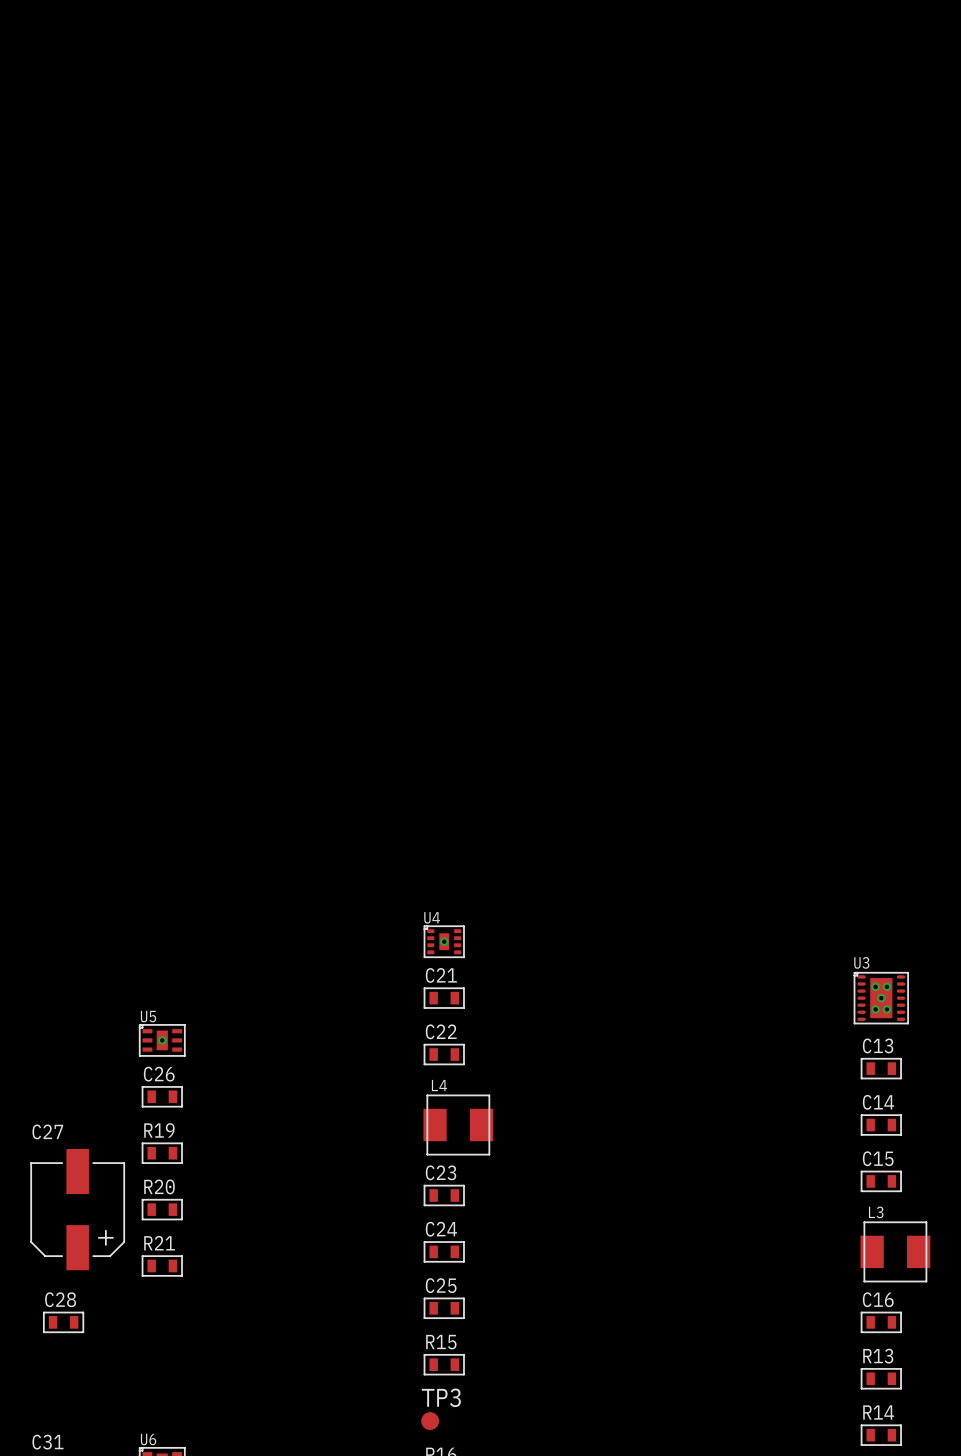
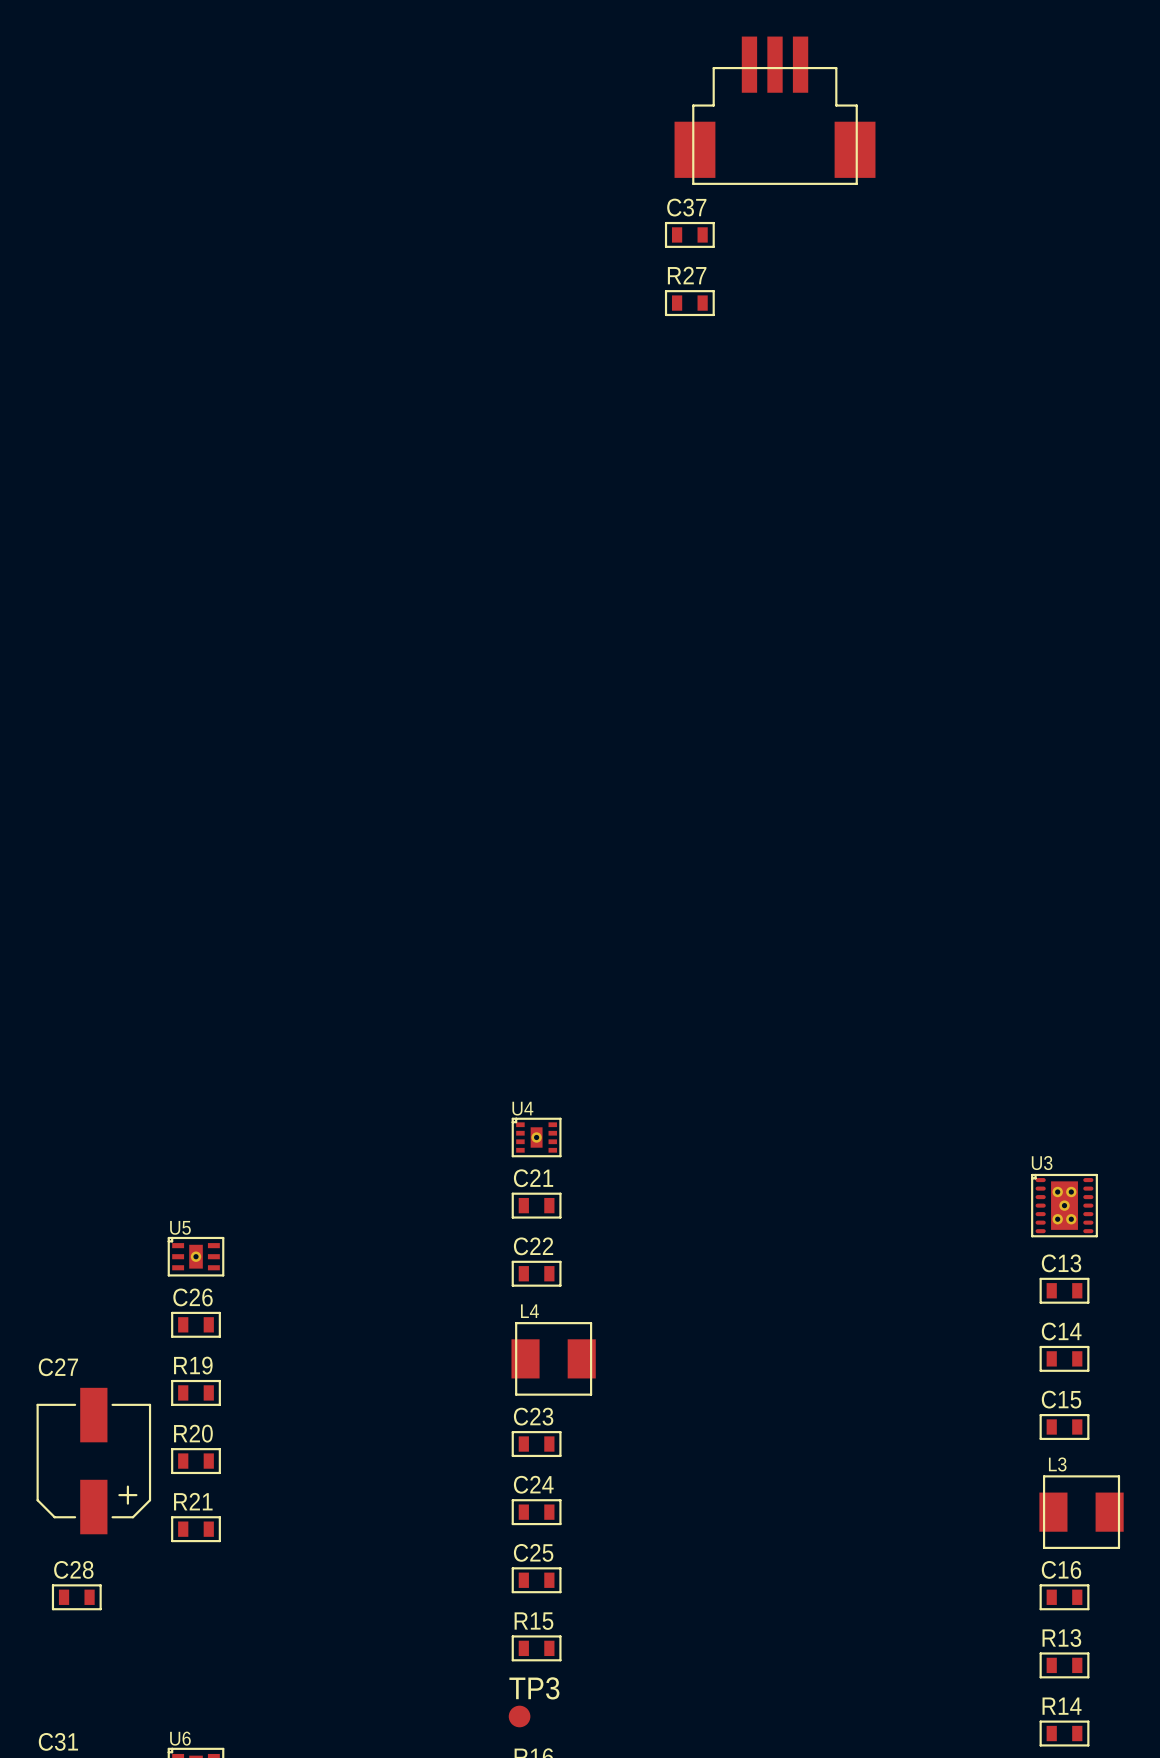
part: none -> (775, 110)
C37: none -> (689, 234)
R27: none -> (689, 303)

